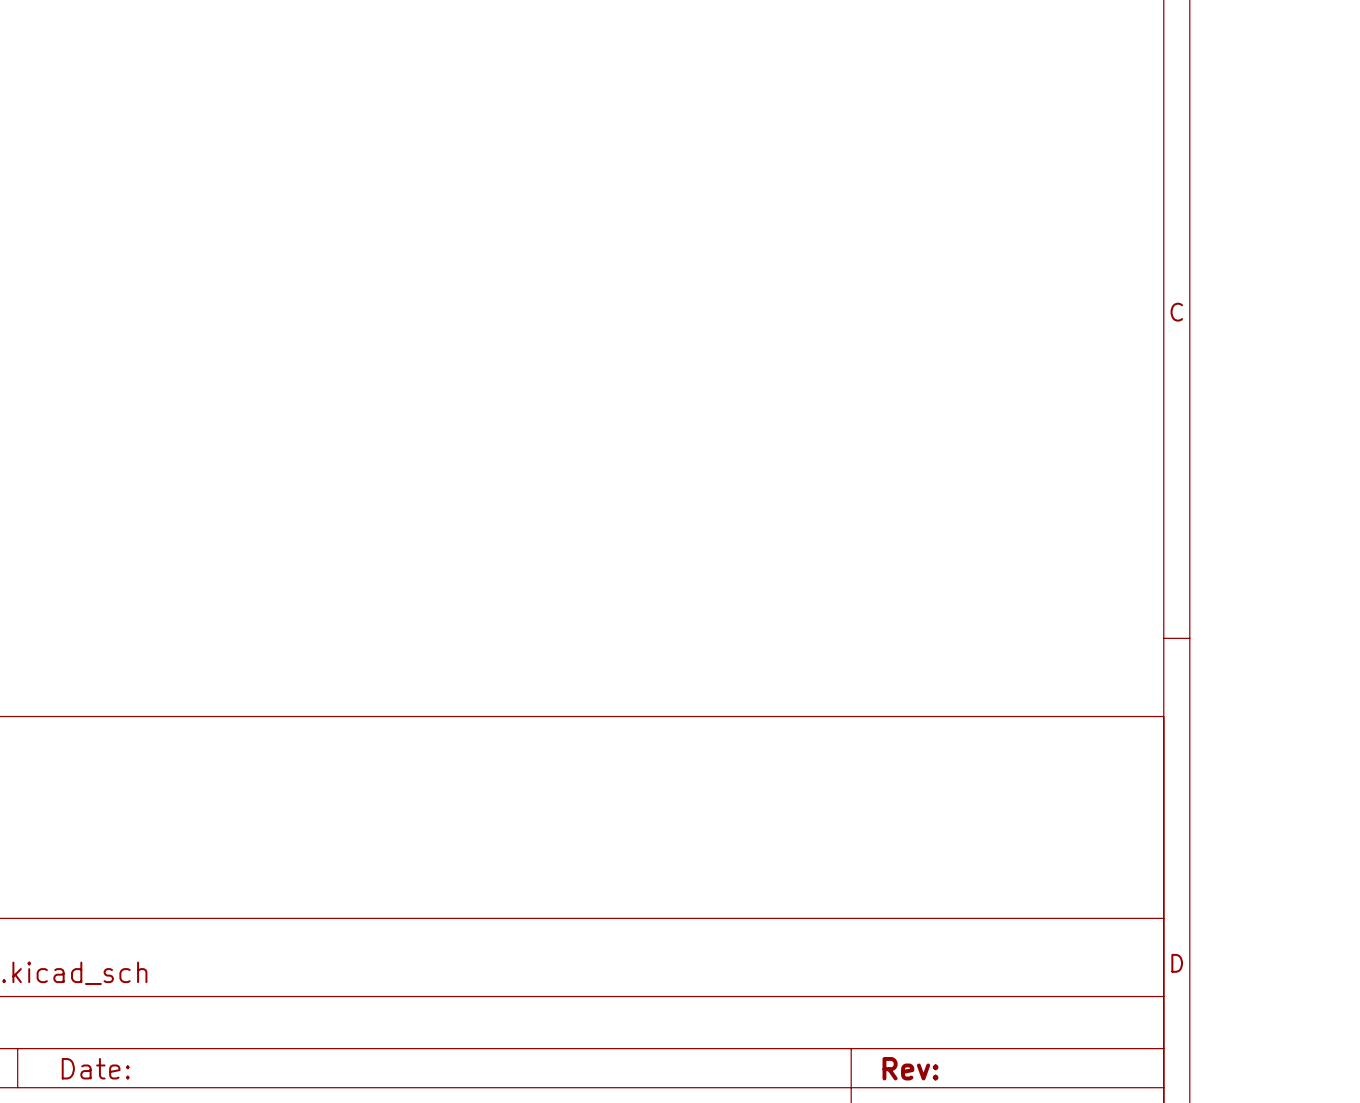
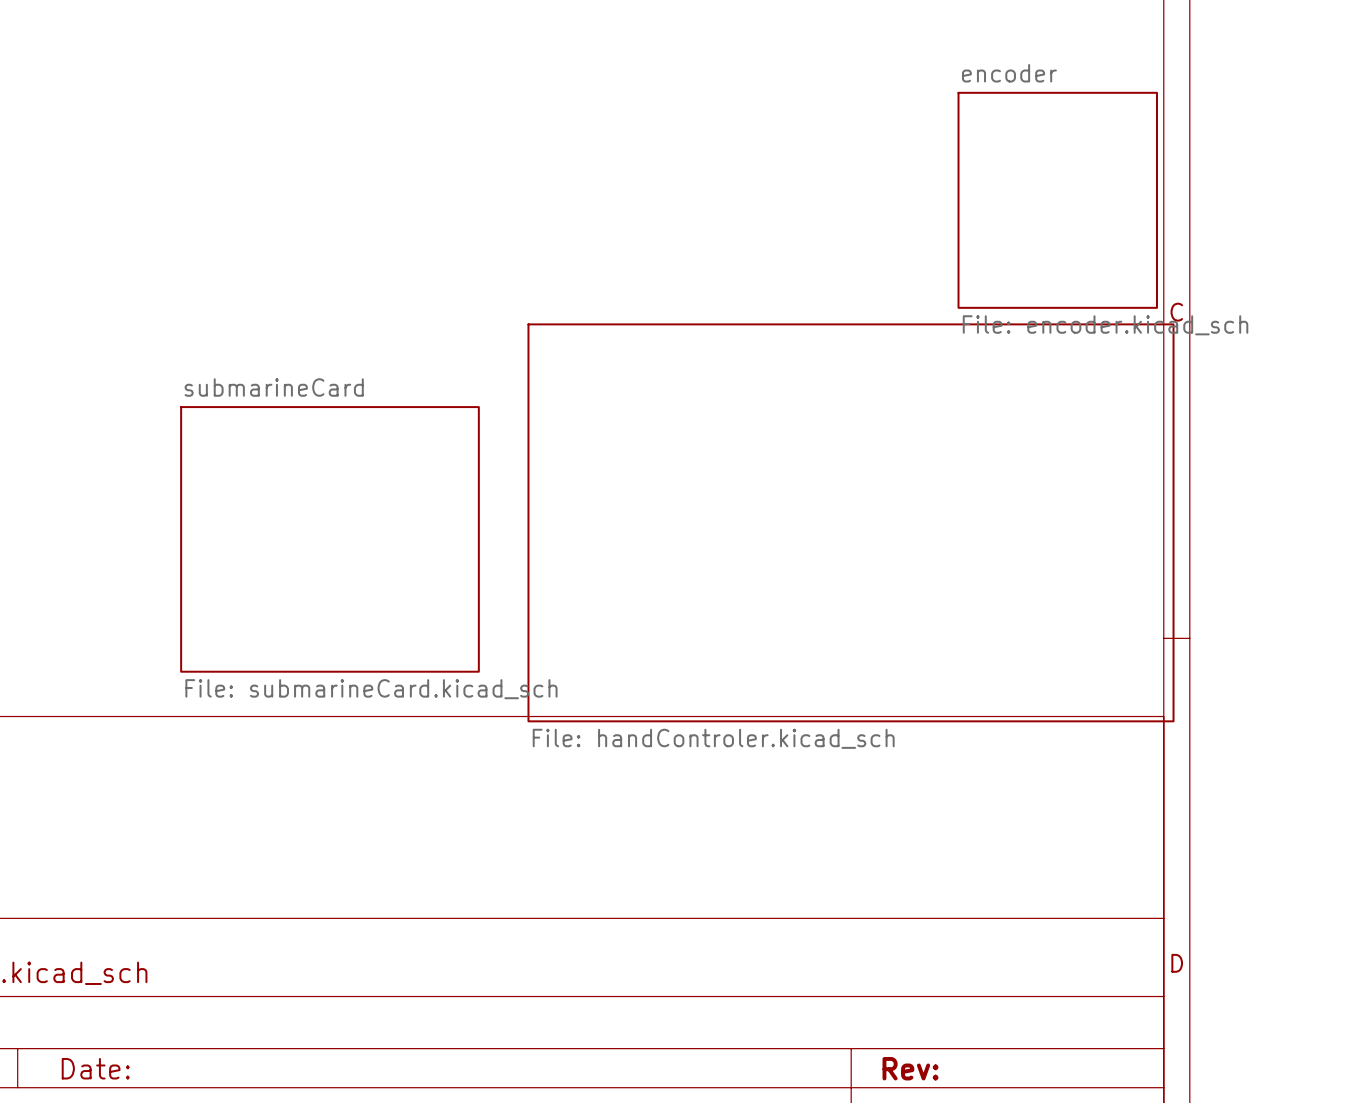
sheet encoder: none -> File: encoder.kicad_sch (1057, 200)
sheet: none -> File: handControler.kicad_sch (851, 522)
sheet submarineCard: none -> File: submarineCard.kicad_sch (329, 539)

